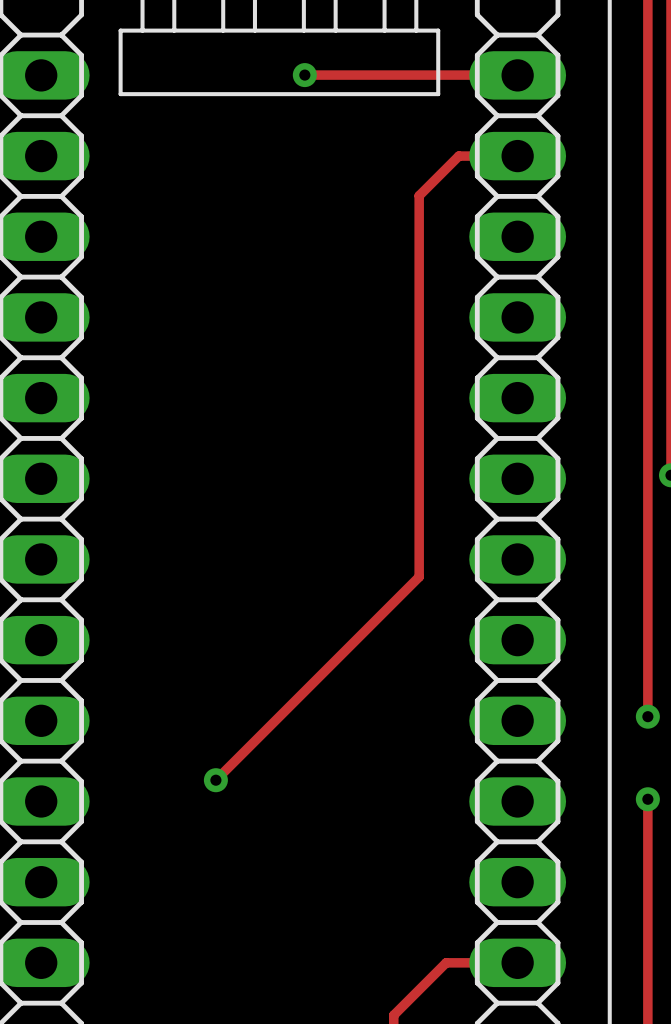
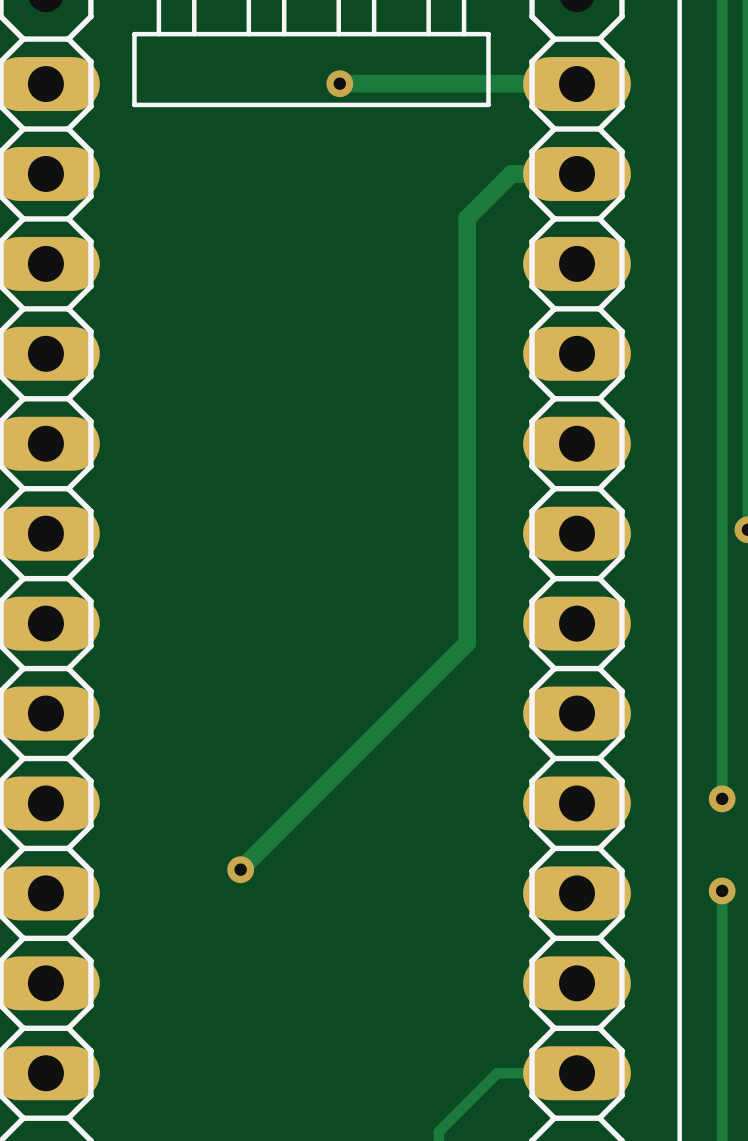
track width: thin (304, 75) (517, 75) -> thick (339, 83) (576, 83)
track width: thin (517, 156) (458, 156) (419, 195) (419, 576) (215, 780) -> thick (577, 173) (511, 173) (467, 218) (467, 643) (240, 869)

